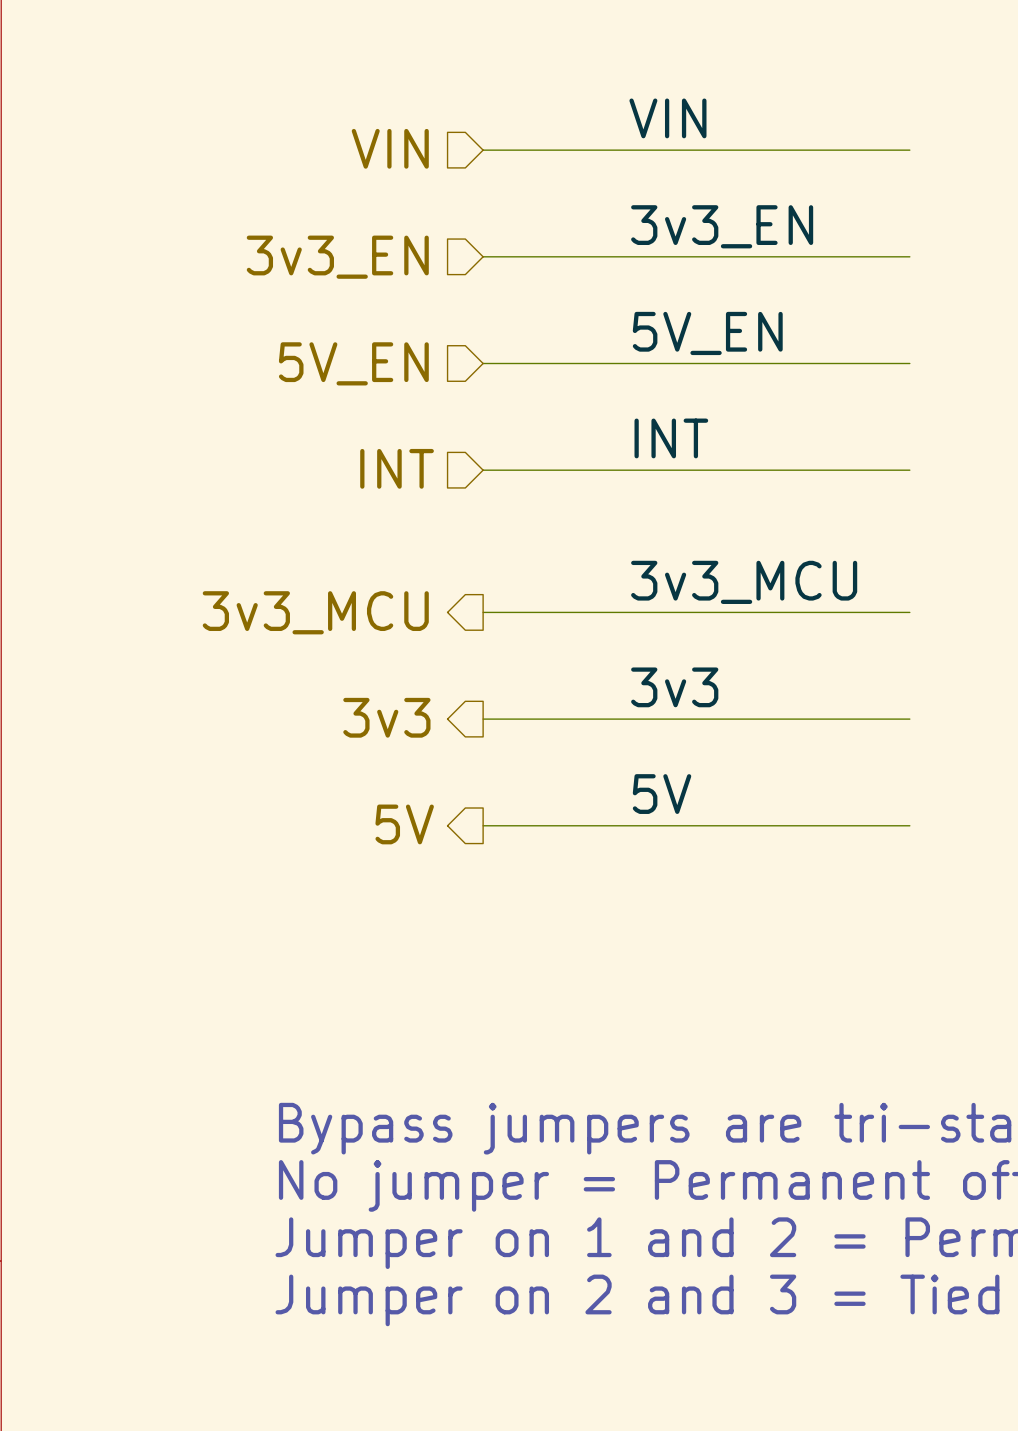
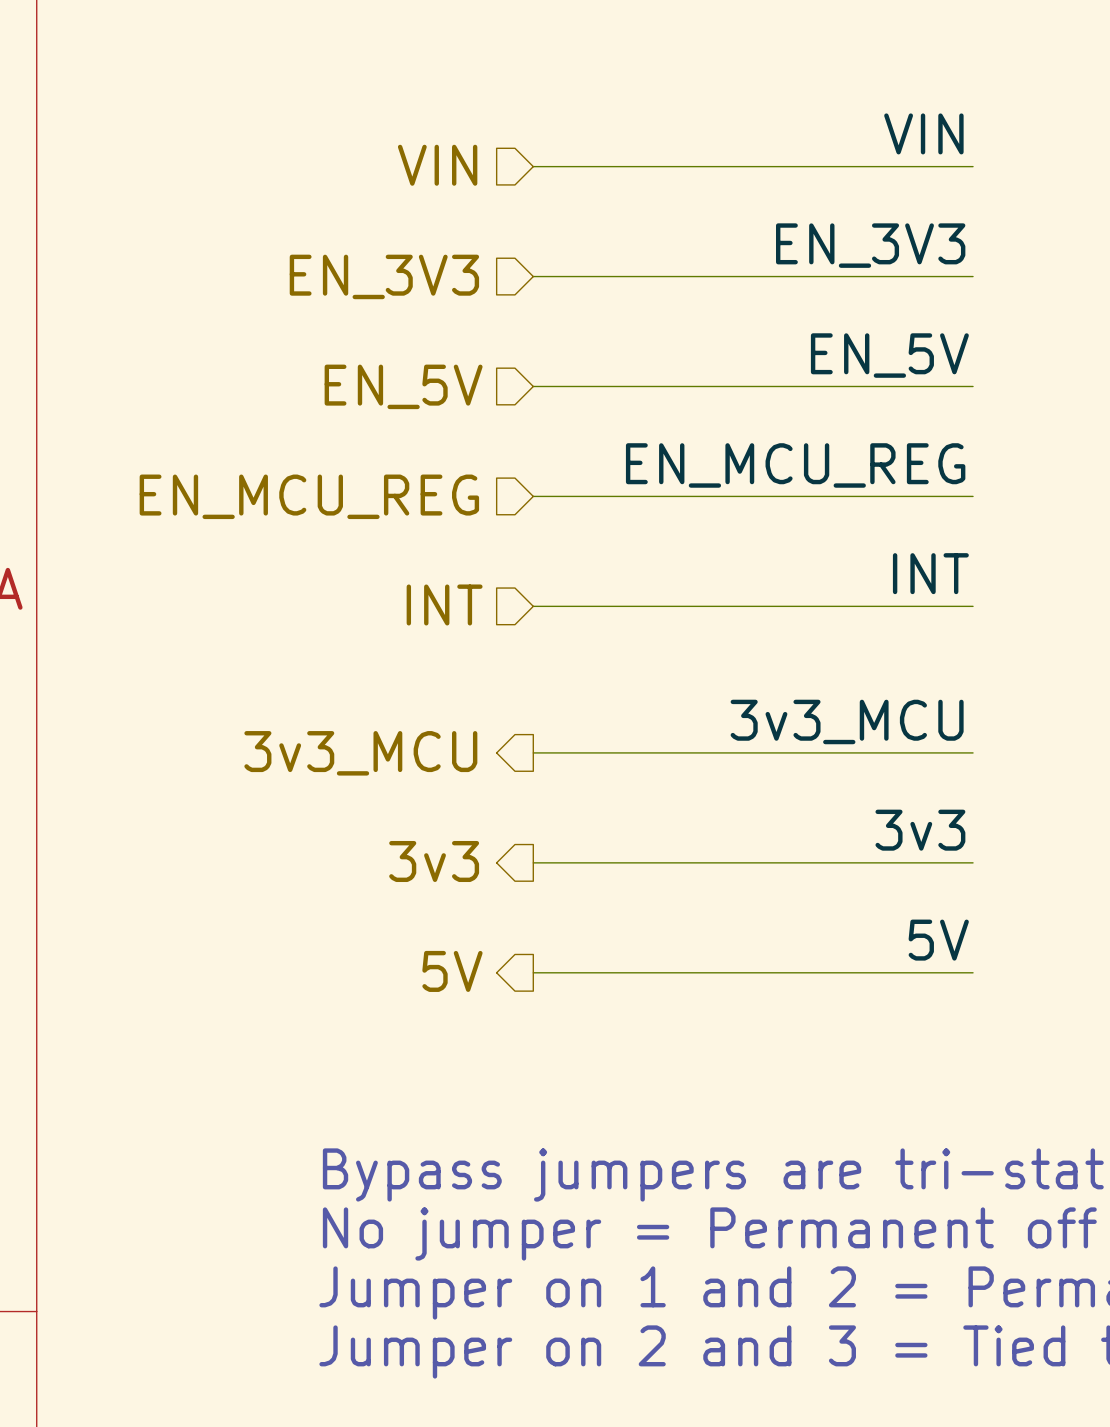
label position: VIN (667, 118) -> VIN (923, 133)
label: 3v3_EN (722, 226) -> none
label: none -> EN_3V3 (870, 245)
hierarchical label: 3v3_EN (337, 257) -> EN_3V3 (384, 276)
label: 5V_EN (707, 333) -> none
label: none -> EN_5V (889, 355)
hierarchical label: 5V_EN (353, 363) -> EN_5V (403, 386)
label position: INT (671, 438) -> INT (930, 573)
label: none -> EN_MCU_REG (795, 465)
hierarchical label: INT (397, 468) -> EN_MCU_REG (309, 496)
hierarchical label: none -> INT (444, 604)
label position: 3v3_MCU (744, 582) -> 3v3_MCU (847, 721)
hierarchical label: 3v3_MCU (315, 612) -> none
wire: (483, 612) (909, 612) -> (533, 606) (973, 606)
label position: 3v3 (674, 687) -> 3v3 (920, 830)
hierarchical label: 3v3 (386, 717) -> 3v3_MCU (360, 753)
label position: 5V (662, 794) -> 5V (938, 940)
hierarchical label: 5V (404, 824) -> 3v3 (434, 861)
hierarchical label: none -> 5V (452, 971)
wire: none -> (533, 972) (973, 972)

